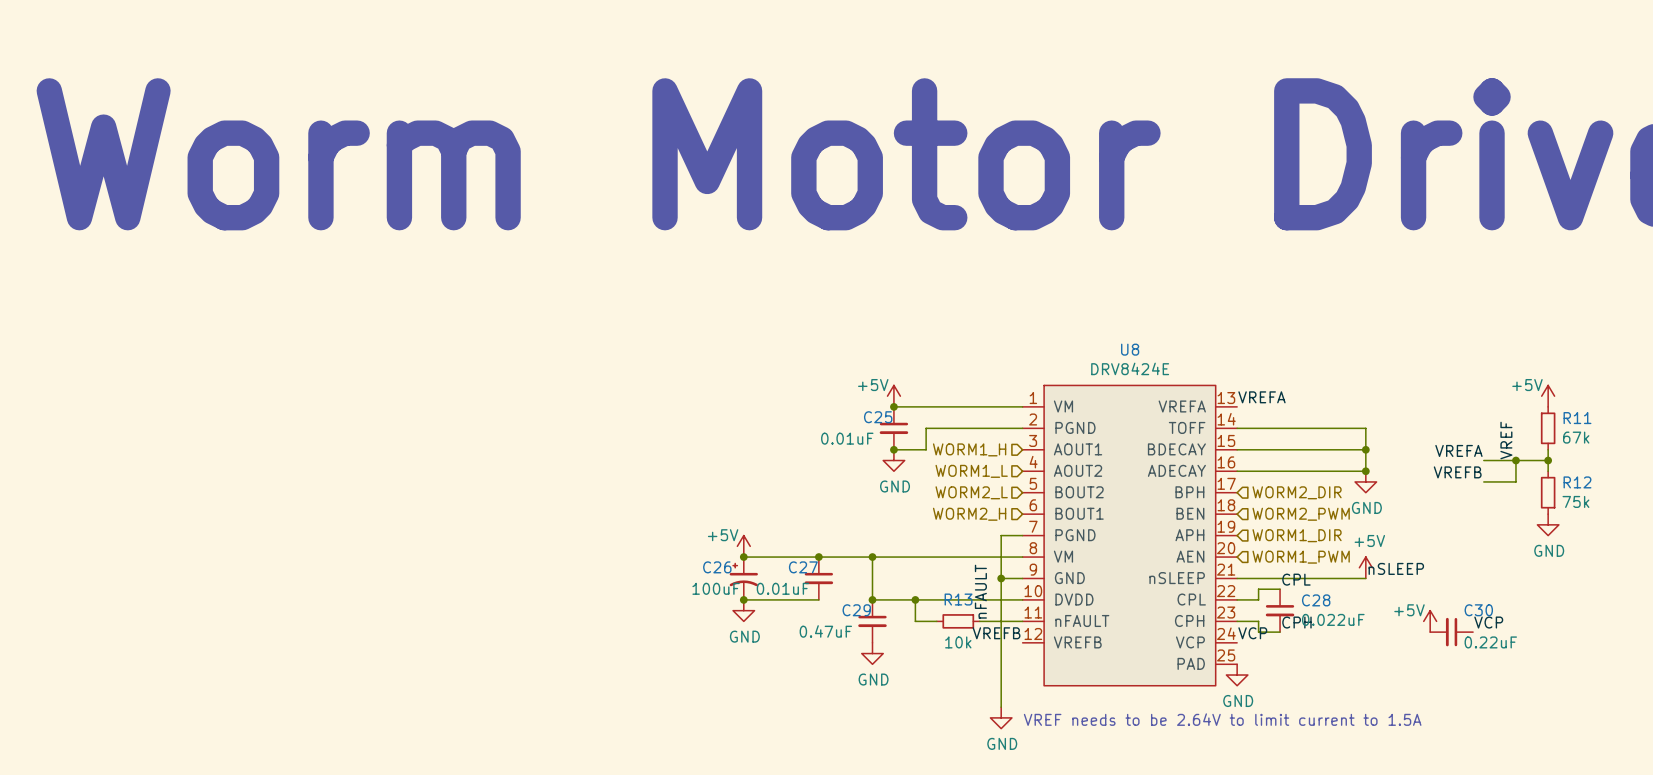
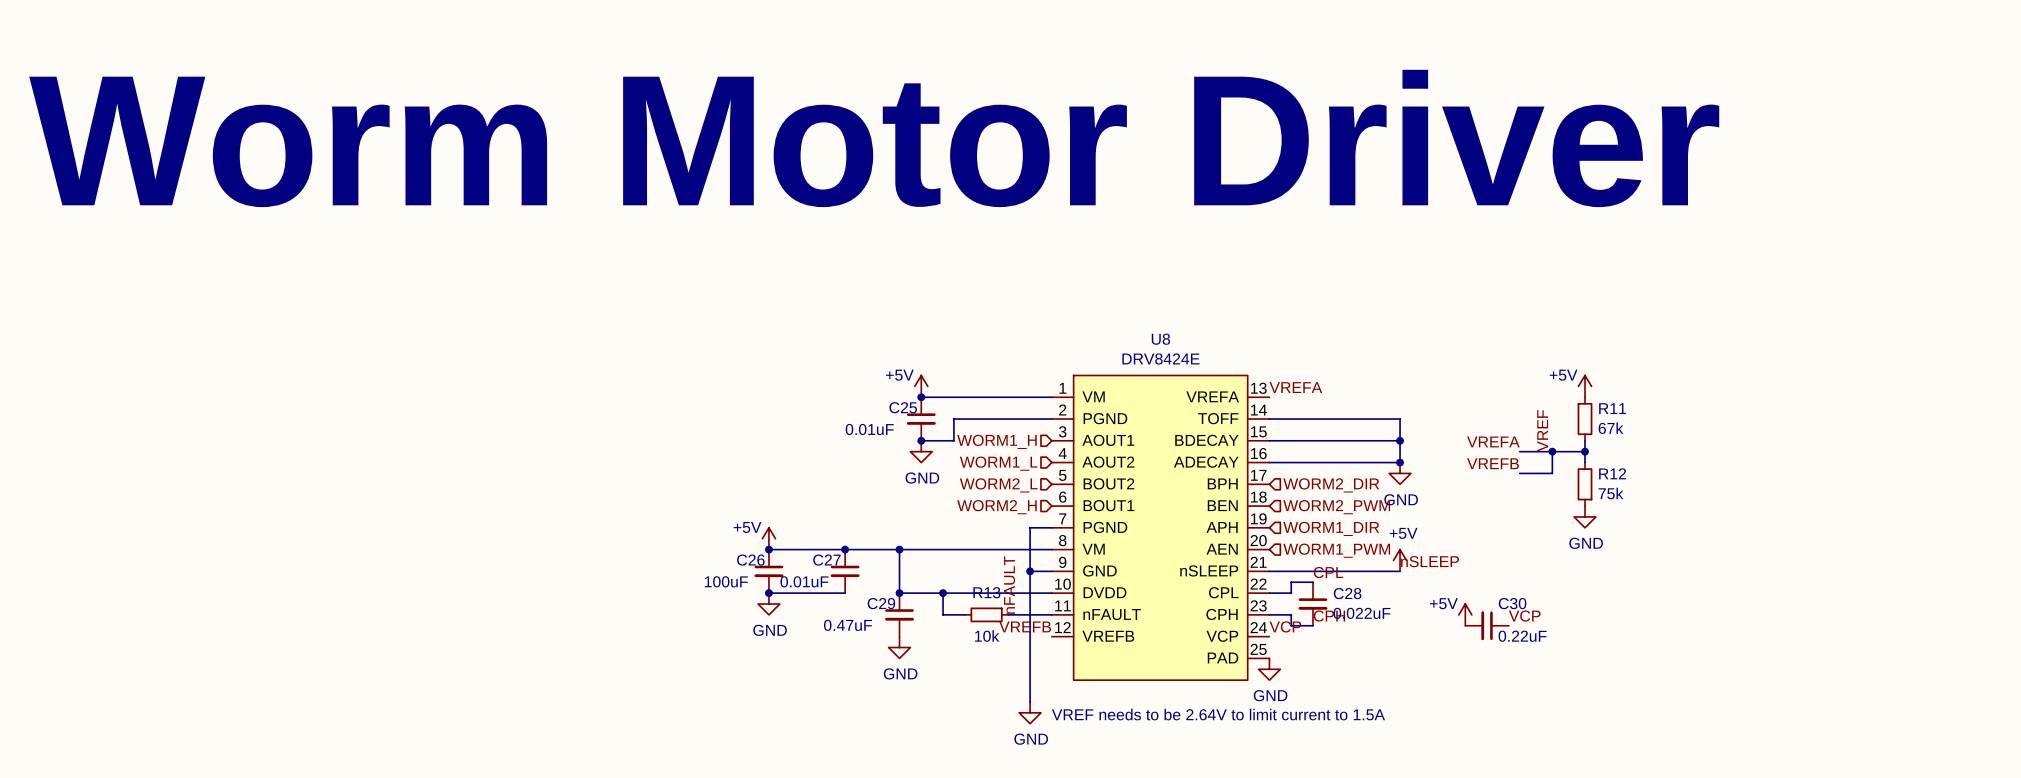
C26 symbol: [729, 557, 758, 600] -> [754, 549, 784, 594]

